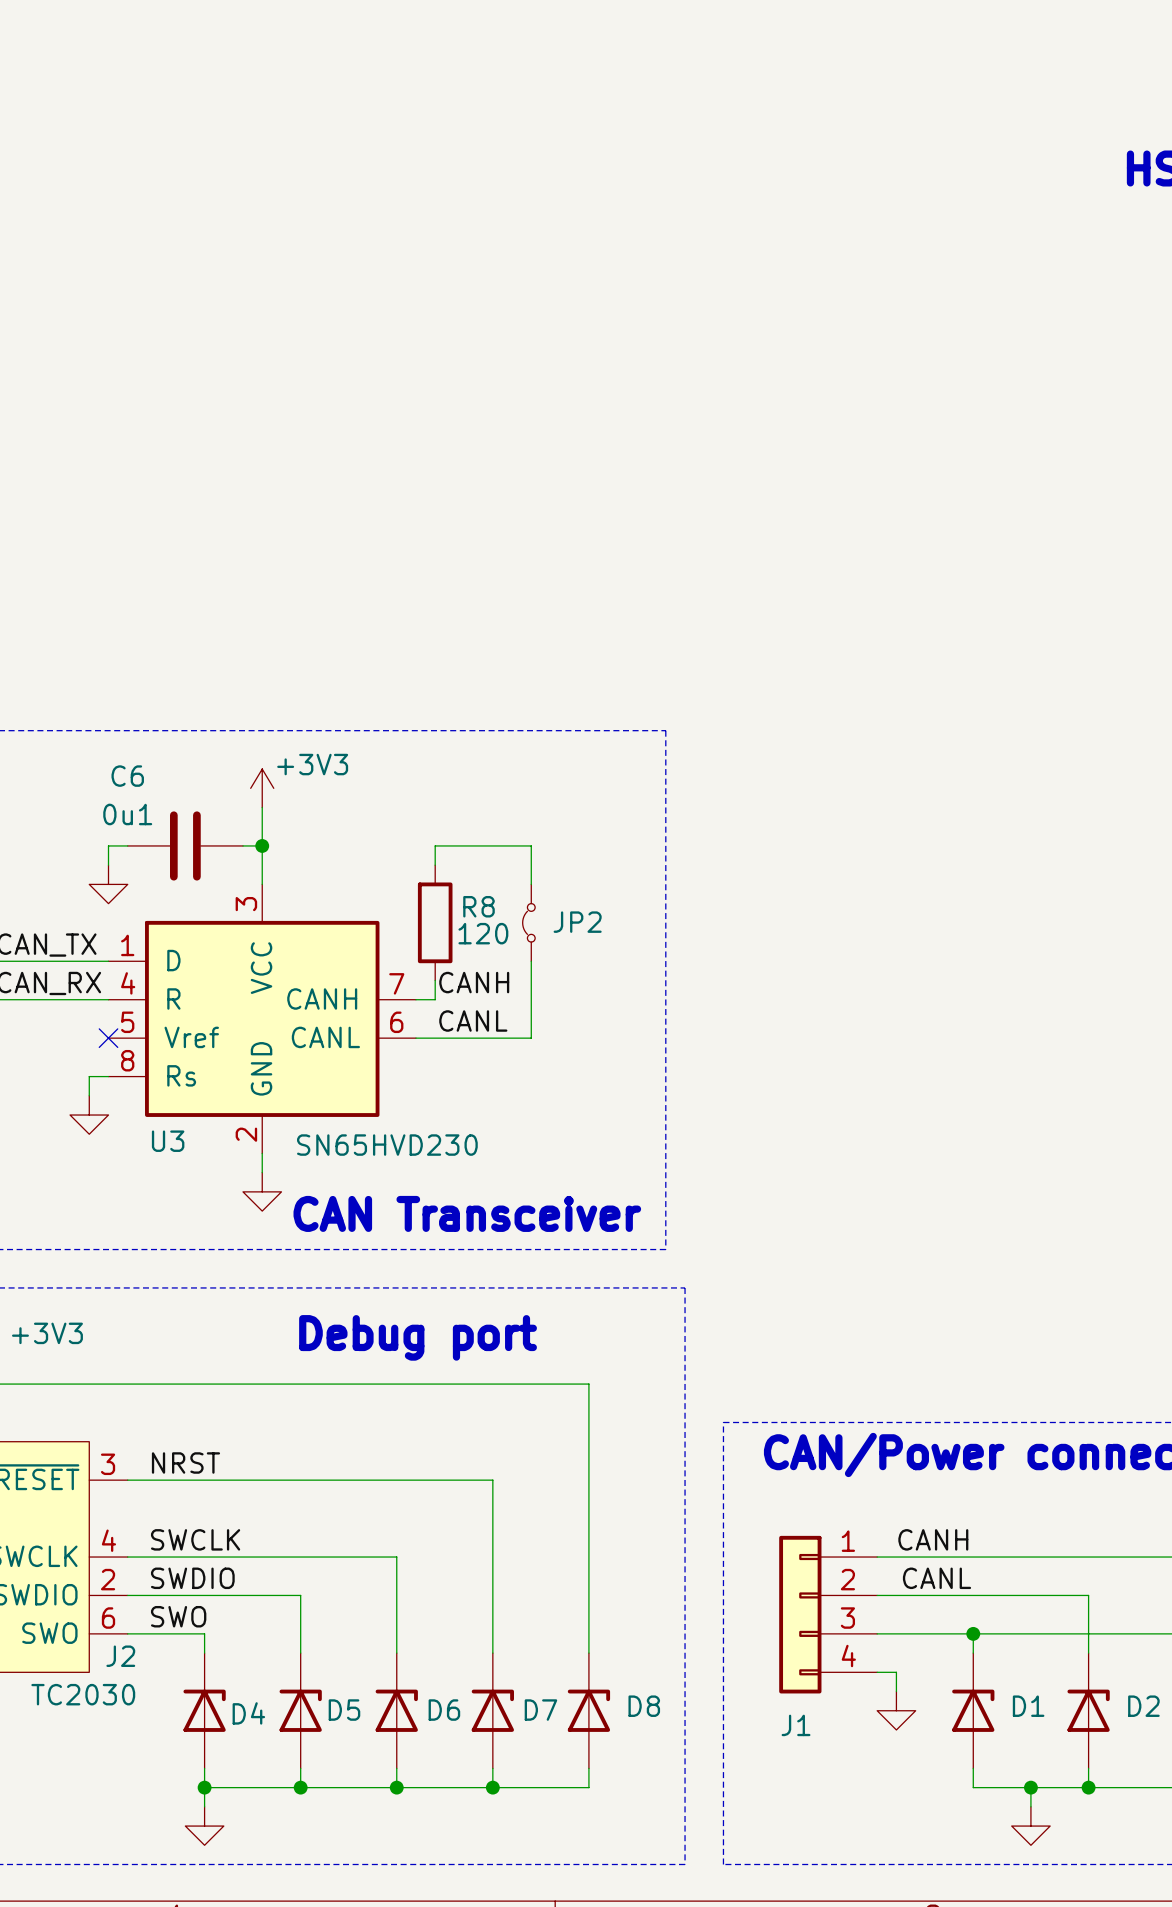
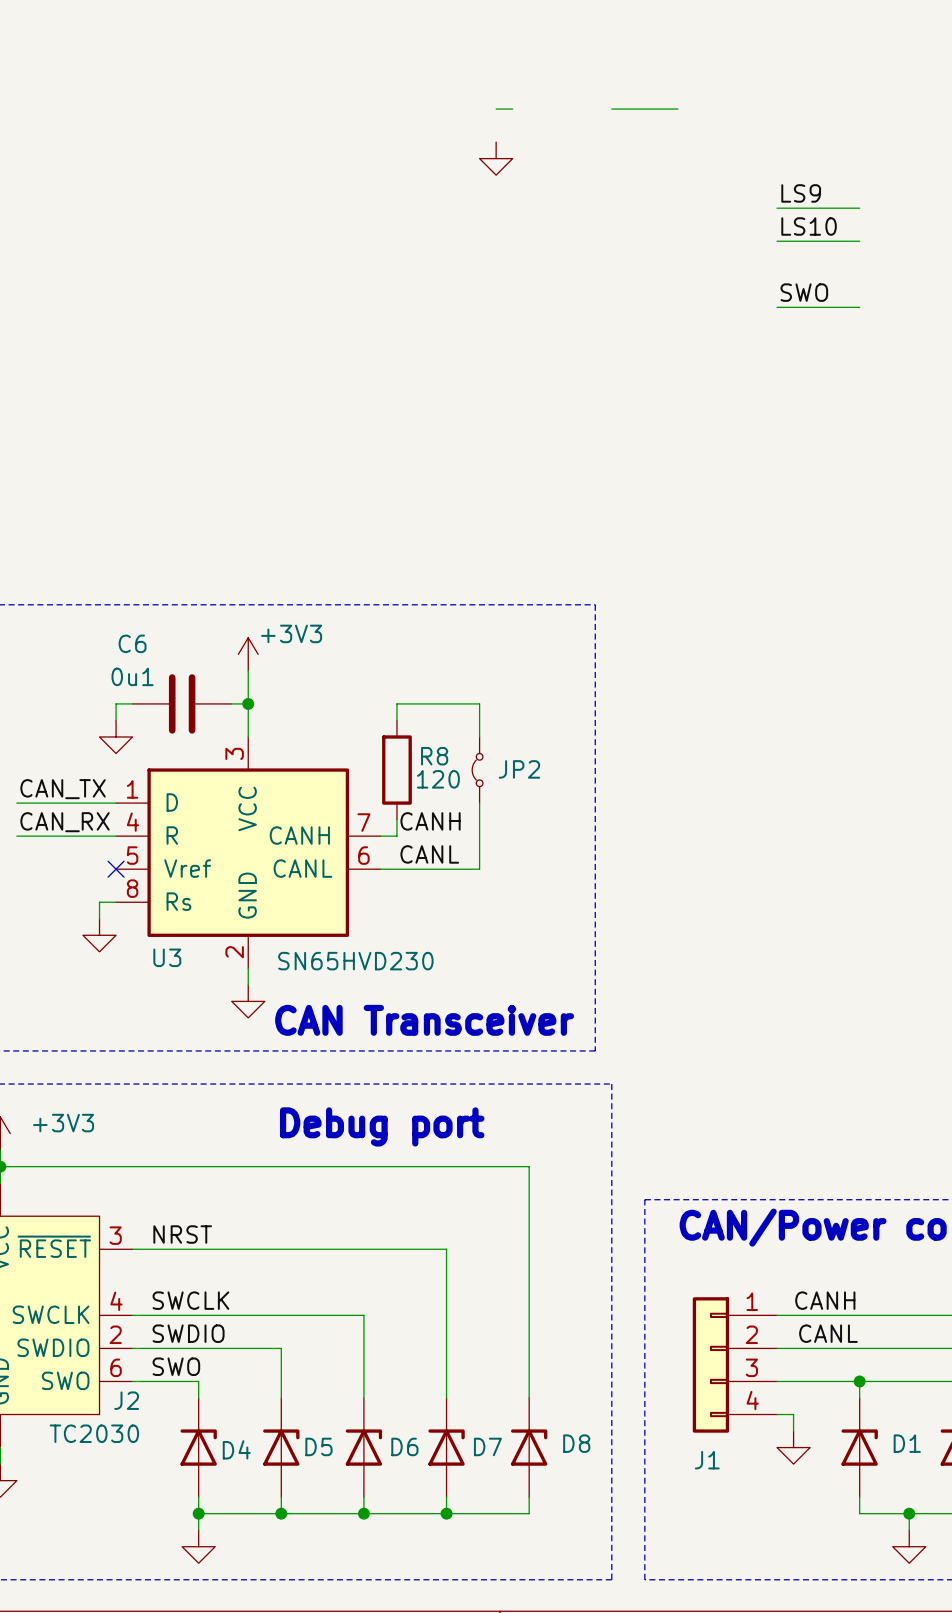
wire: none -> (496, 109) (512, 109)
wire: none -> (611, 109) (677, 109)
power symbol: none -> (496, 158)
label: none -> LS9 (801, 193)
wire: none -> (777, 208) (859, 208)
label: none -> LS10 (809, 226)
wire: none -> (777, 241) (859, 241)
label: none -> SWO (804, 292)
wire: none -> (777, 307) (859, 307)

